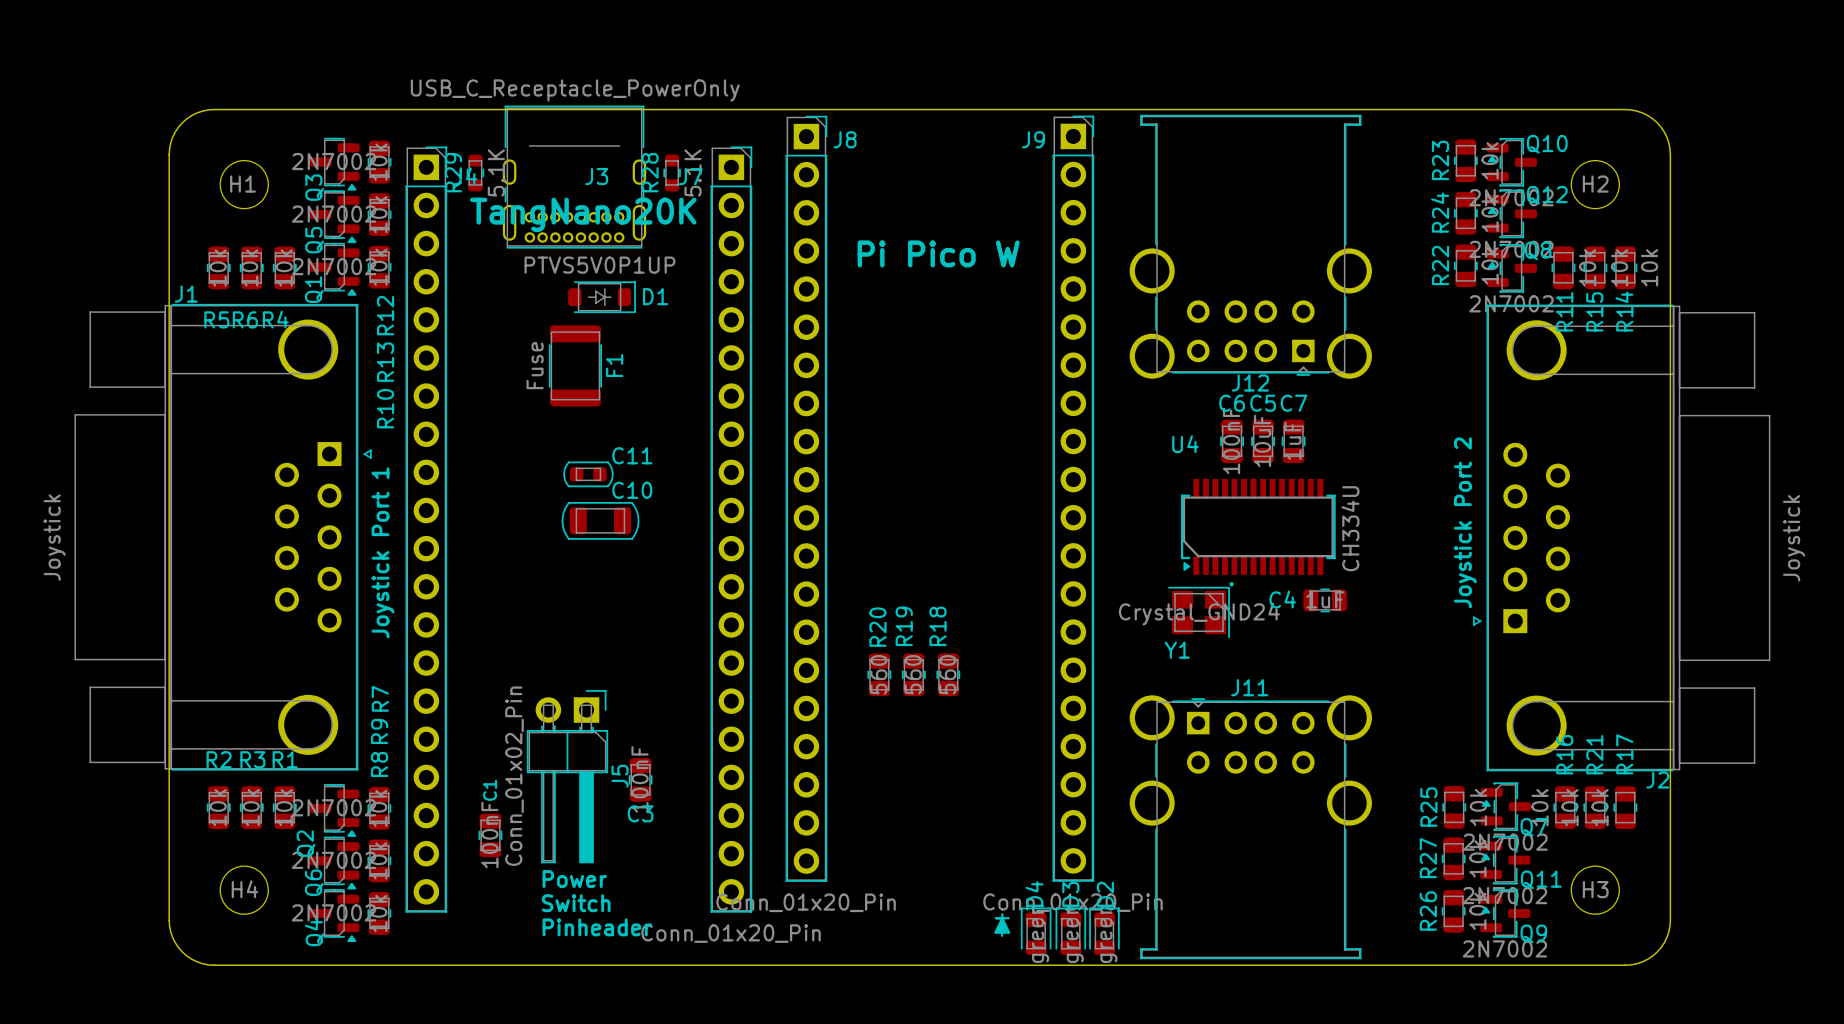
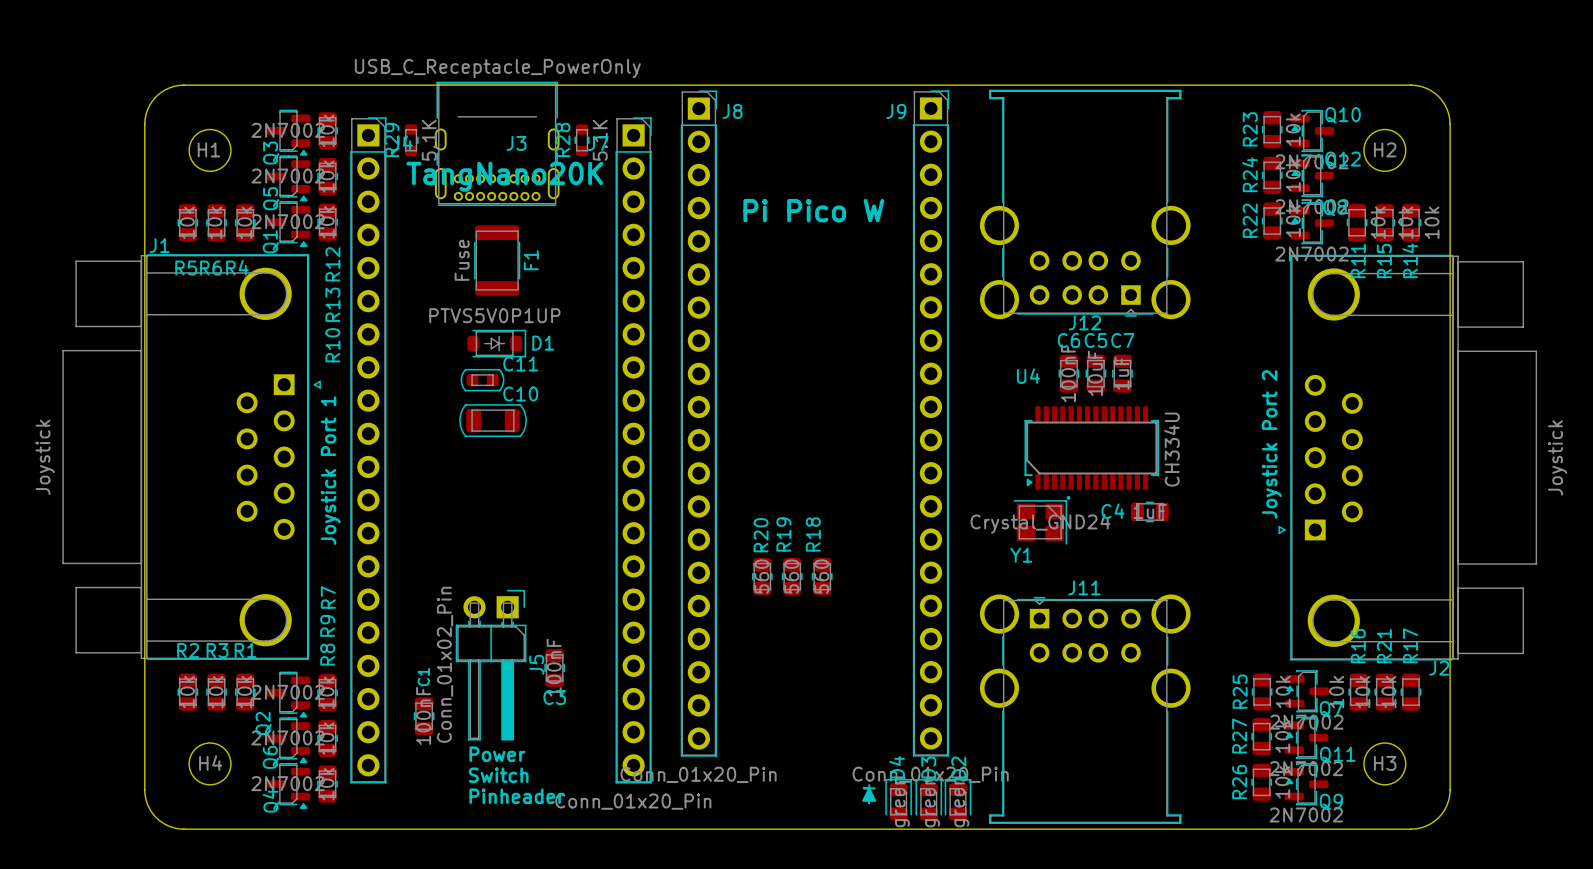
D1 position: (602, 297) -> (496, 343)
F1 position: (575, 365) -> (497, 260)
C11 position: (588, 474) -> (482, 380)
C10 position: (600, 520) -> (493, 420)

